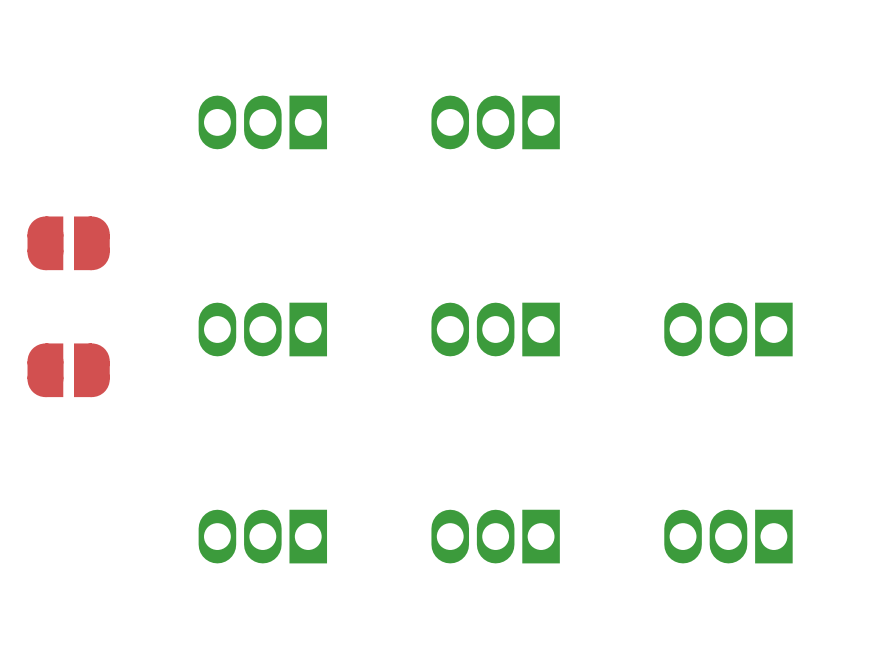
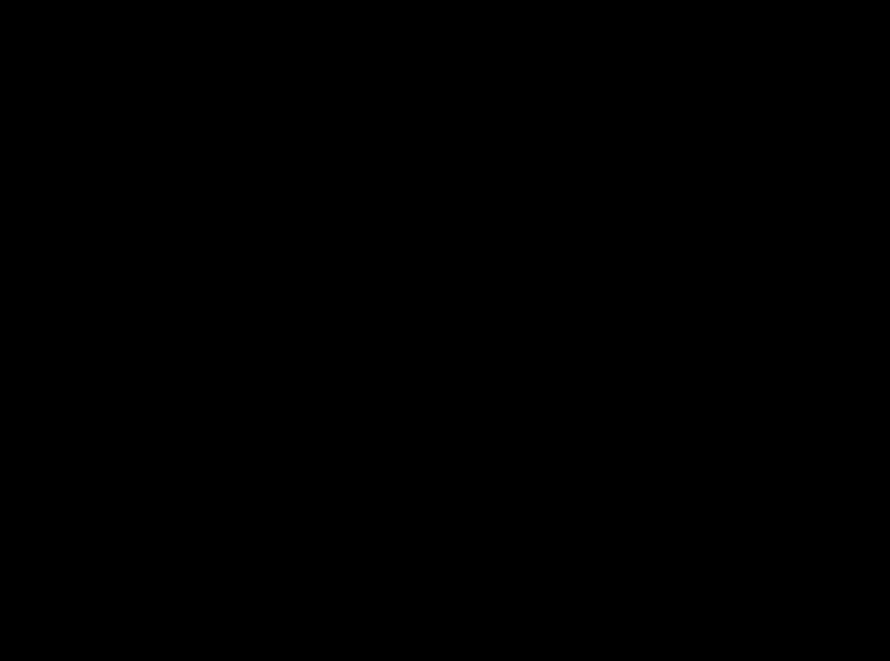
part: (262, 122) -> none
part: (495, 122) -> none
part: (68, 243) -> none
part: (262, 329) -> none
part: (495, 329) -> none
part: (728, 329) -> none
part: (68, 370) -> none
part: (262, 536) -> none
part: (495, 536) -> none
part: (728, 536) -> none

